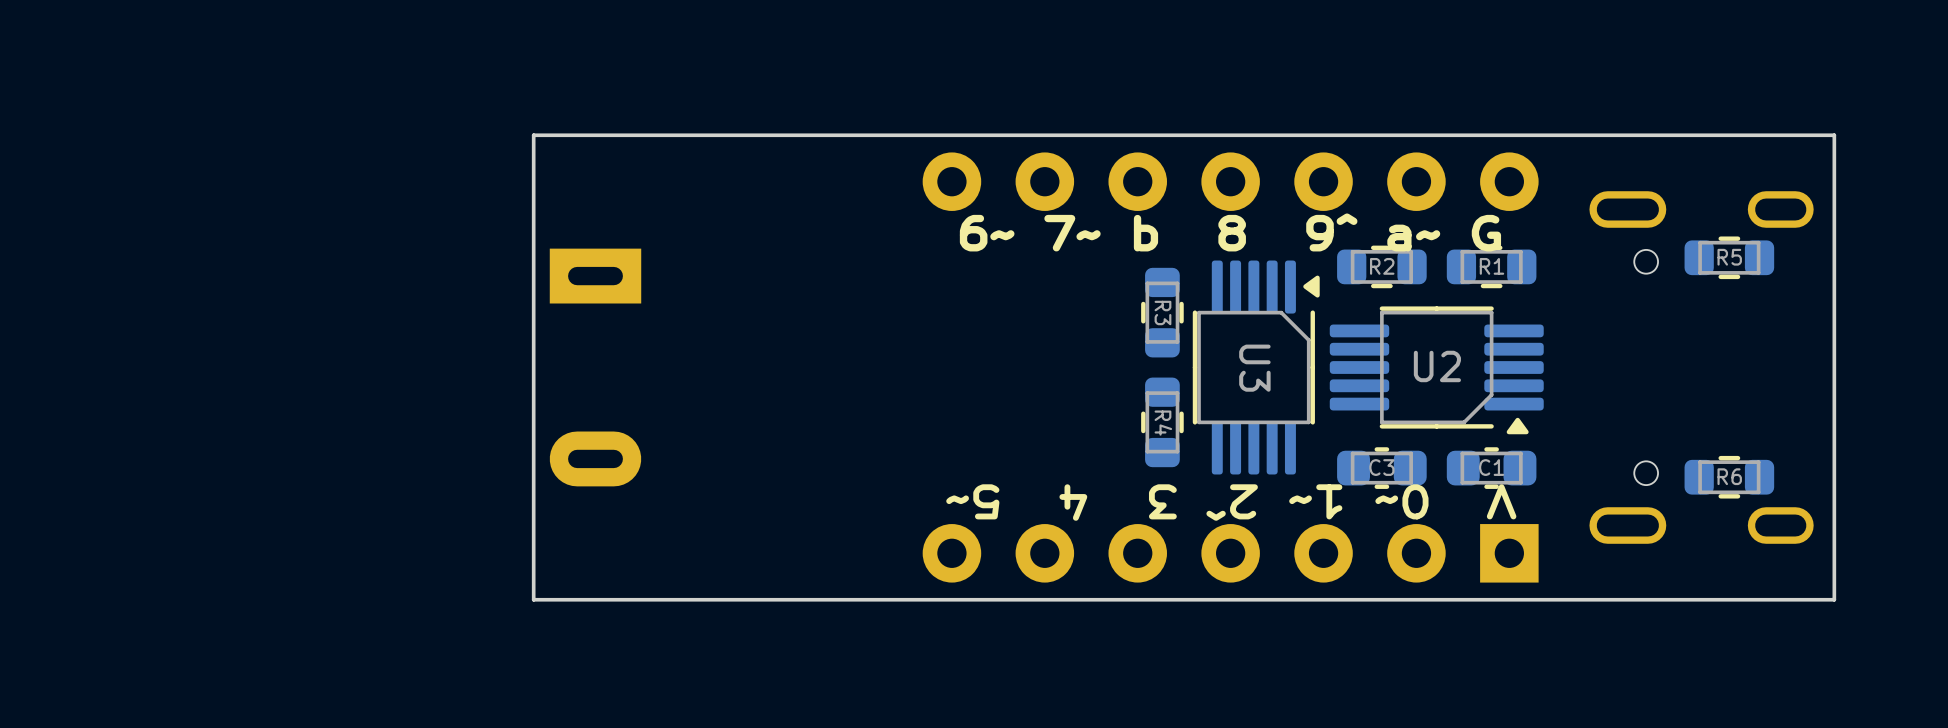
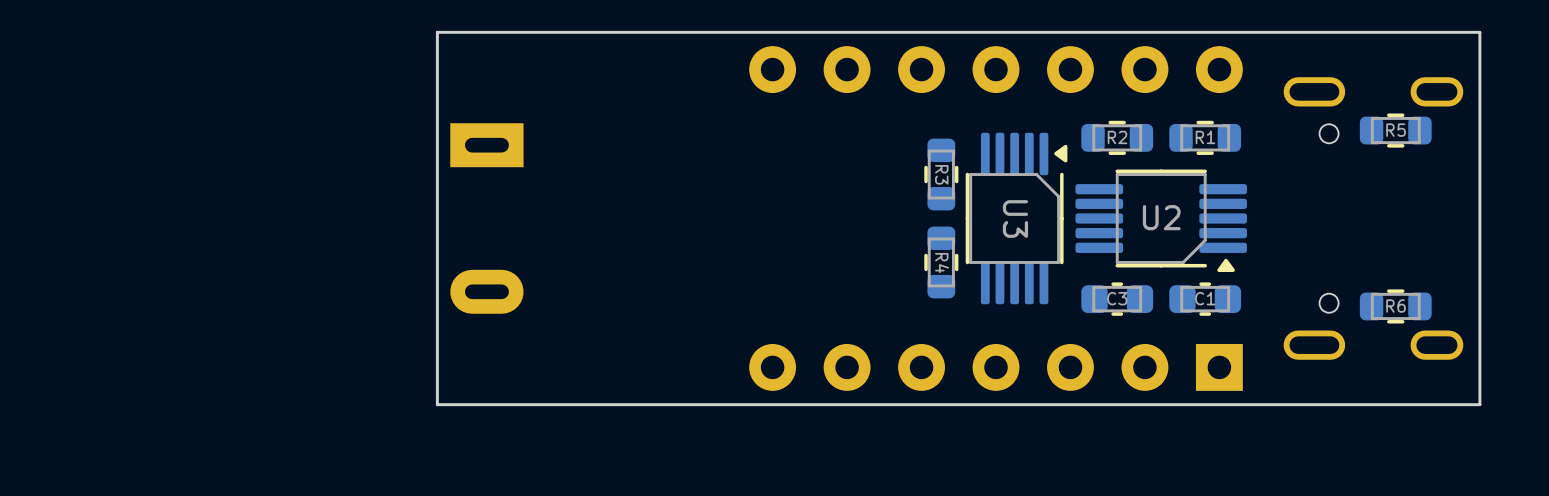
text: 6~ 7~ b 8 9^ a~ G (1230, 232) -> none
text: V 0~ 1~ 2^ 3 4 5~ (1231, 502) -> none

